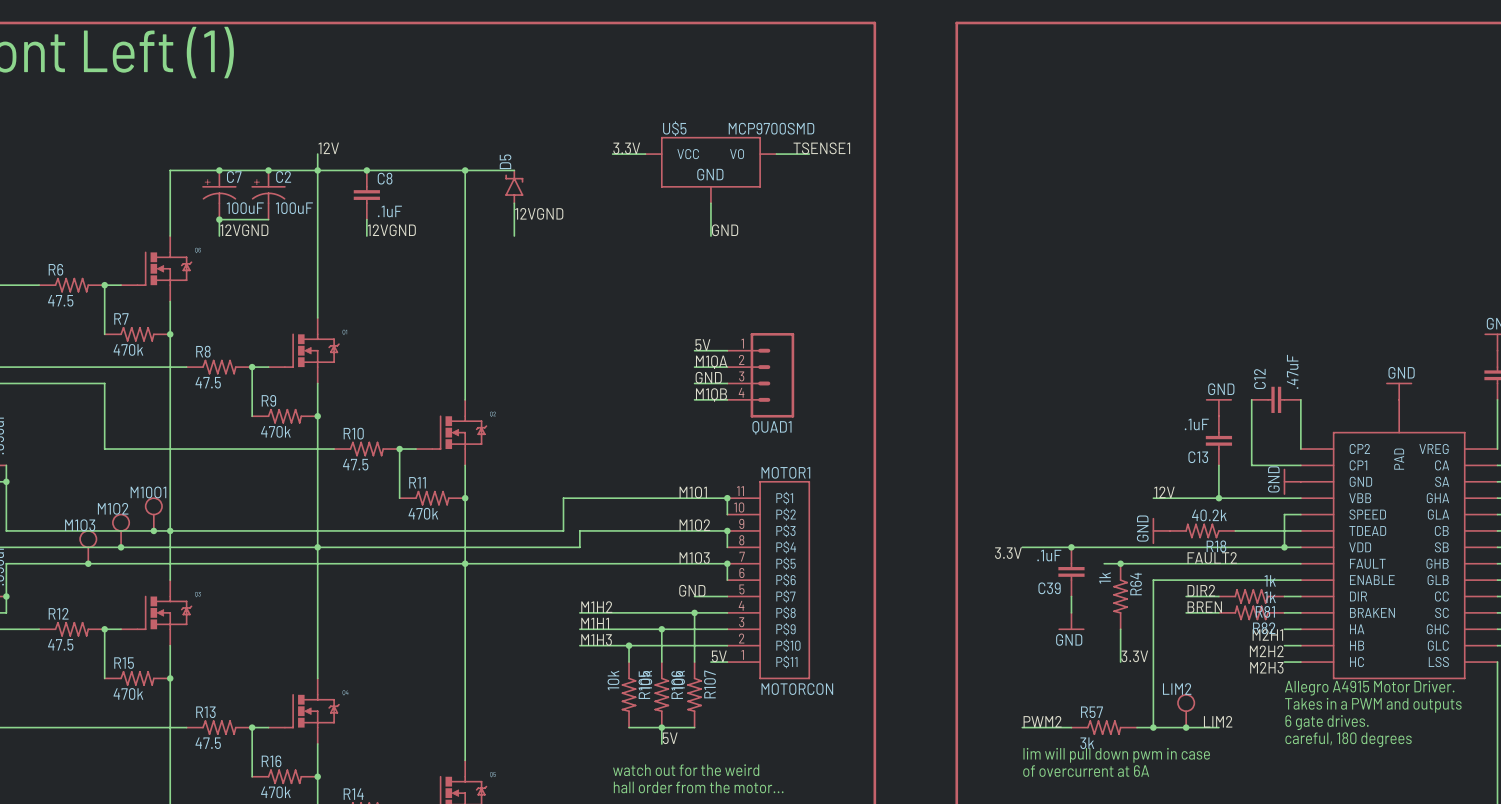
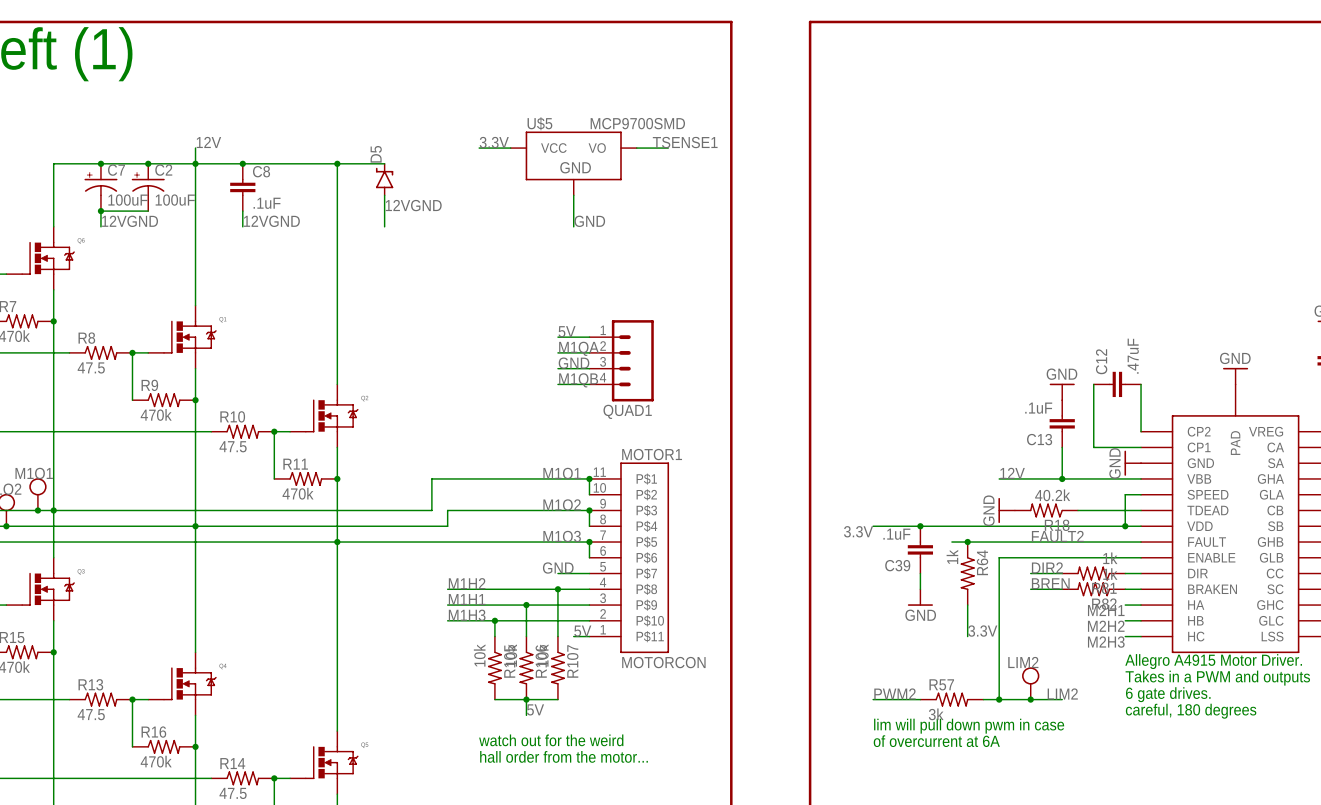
M10O1 name: M10O1 (148, 492) -> M1O1 (34, 473)

